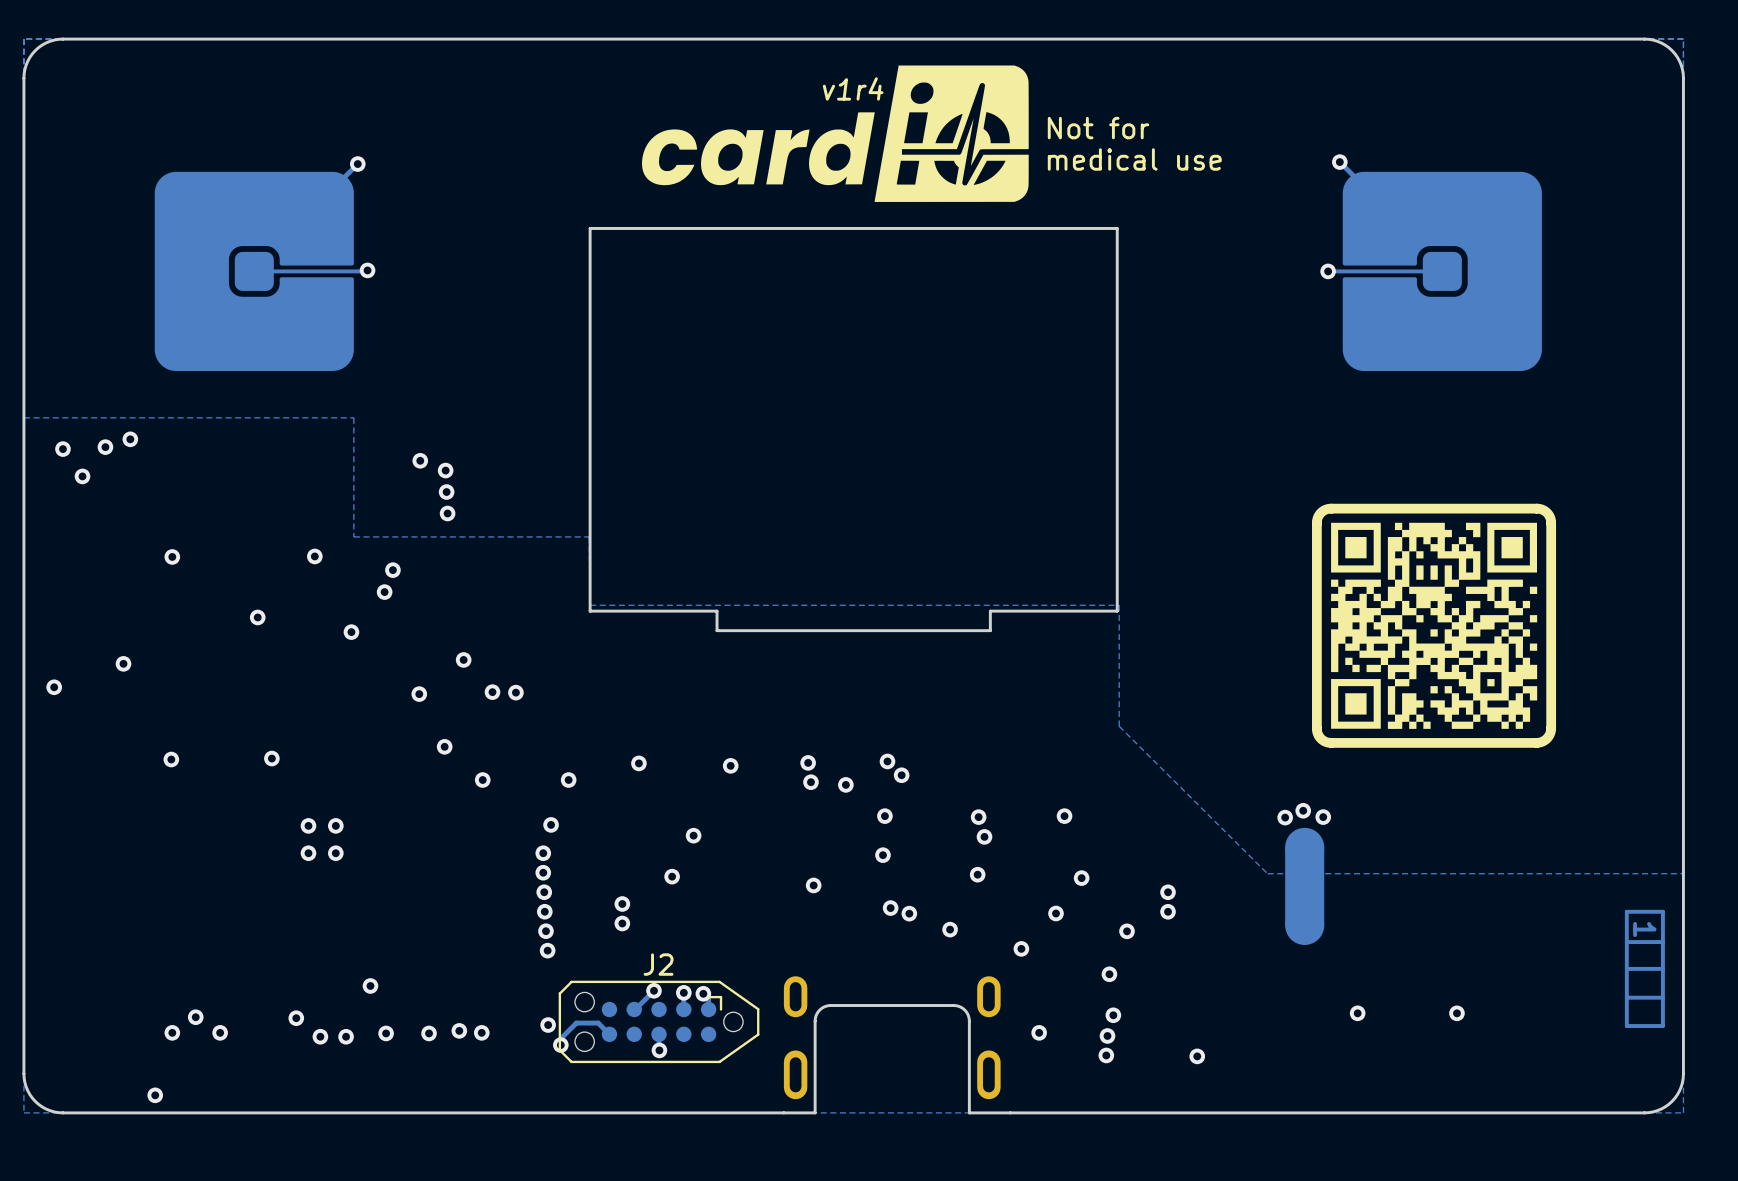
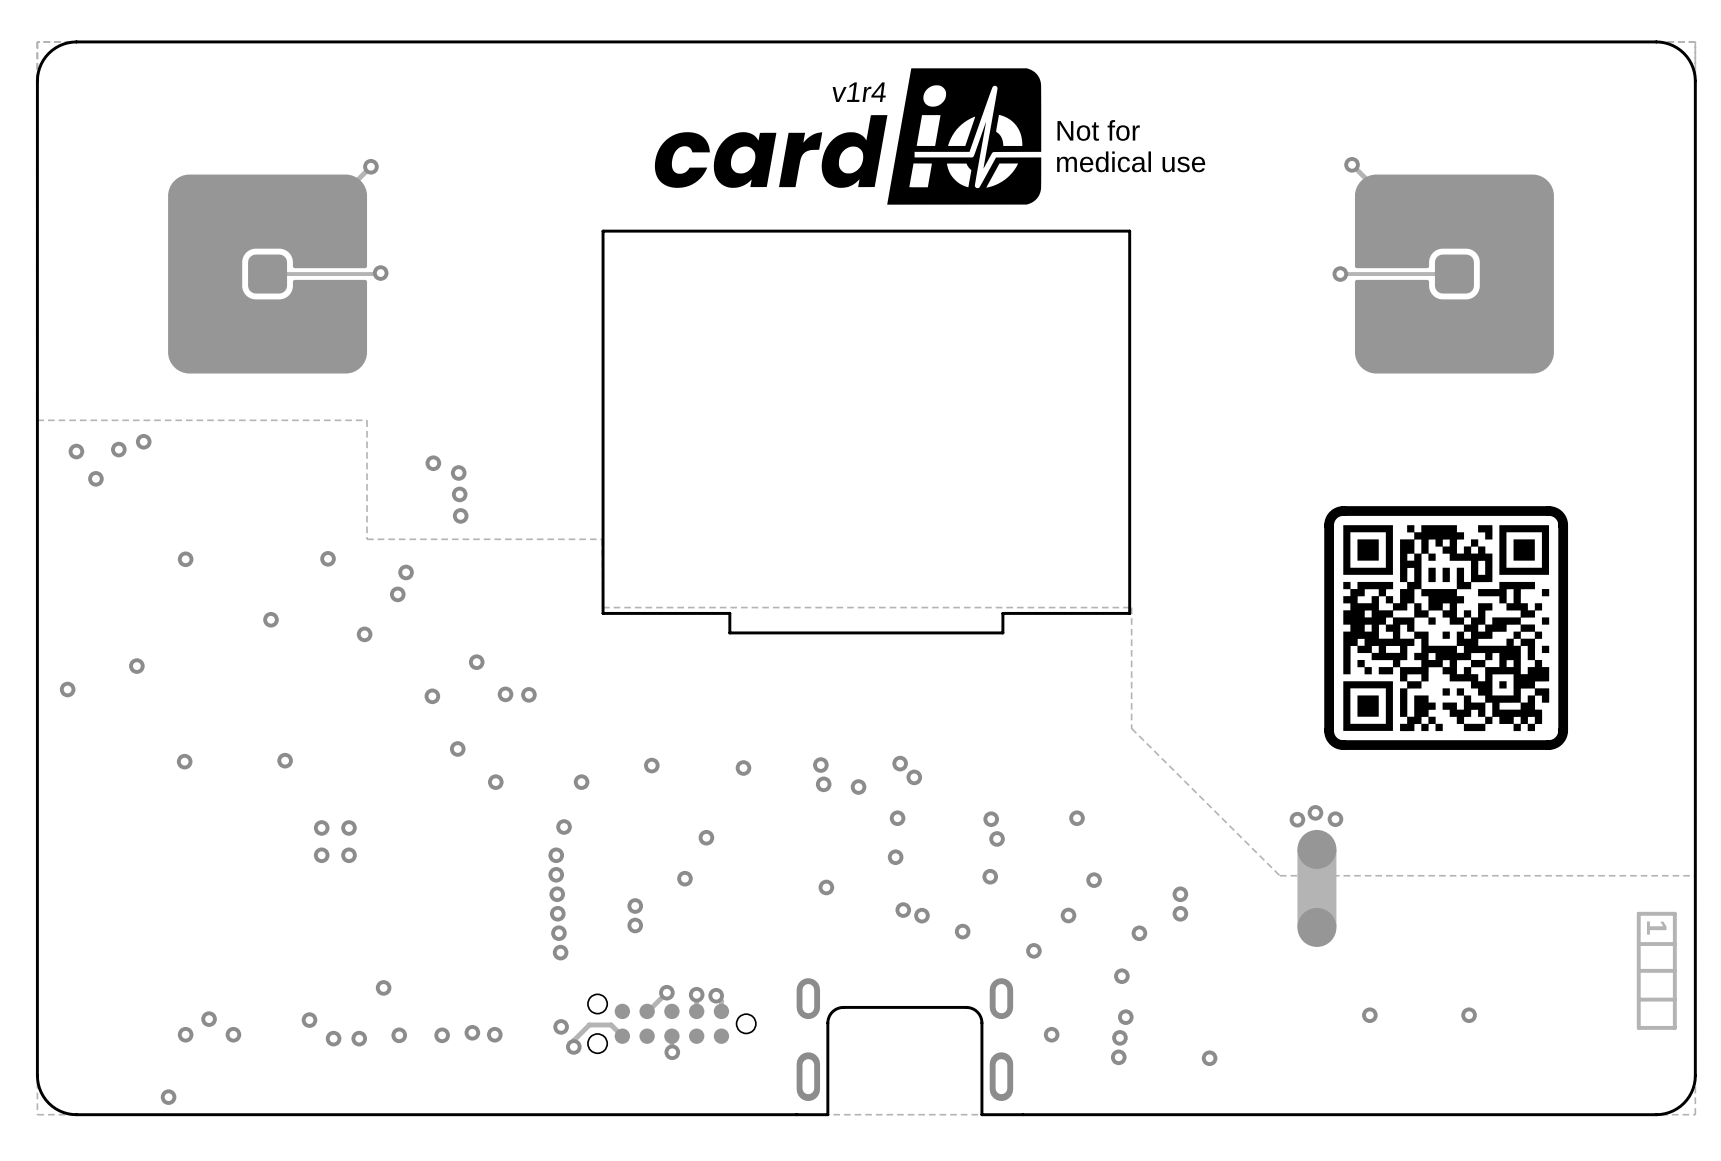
J2: (659, 1021) -> none

